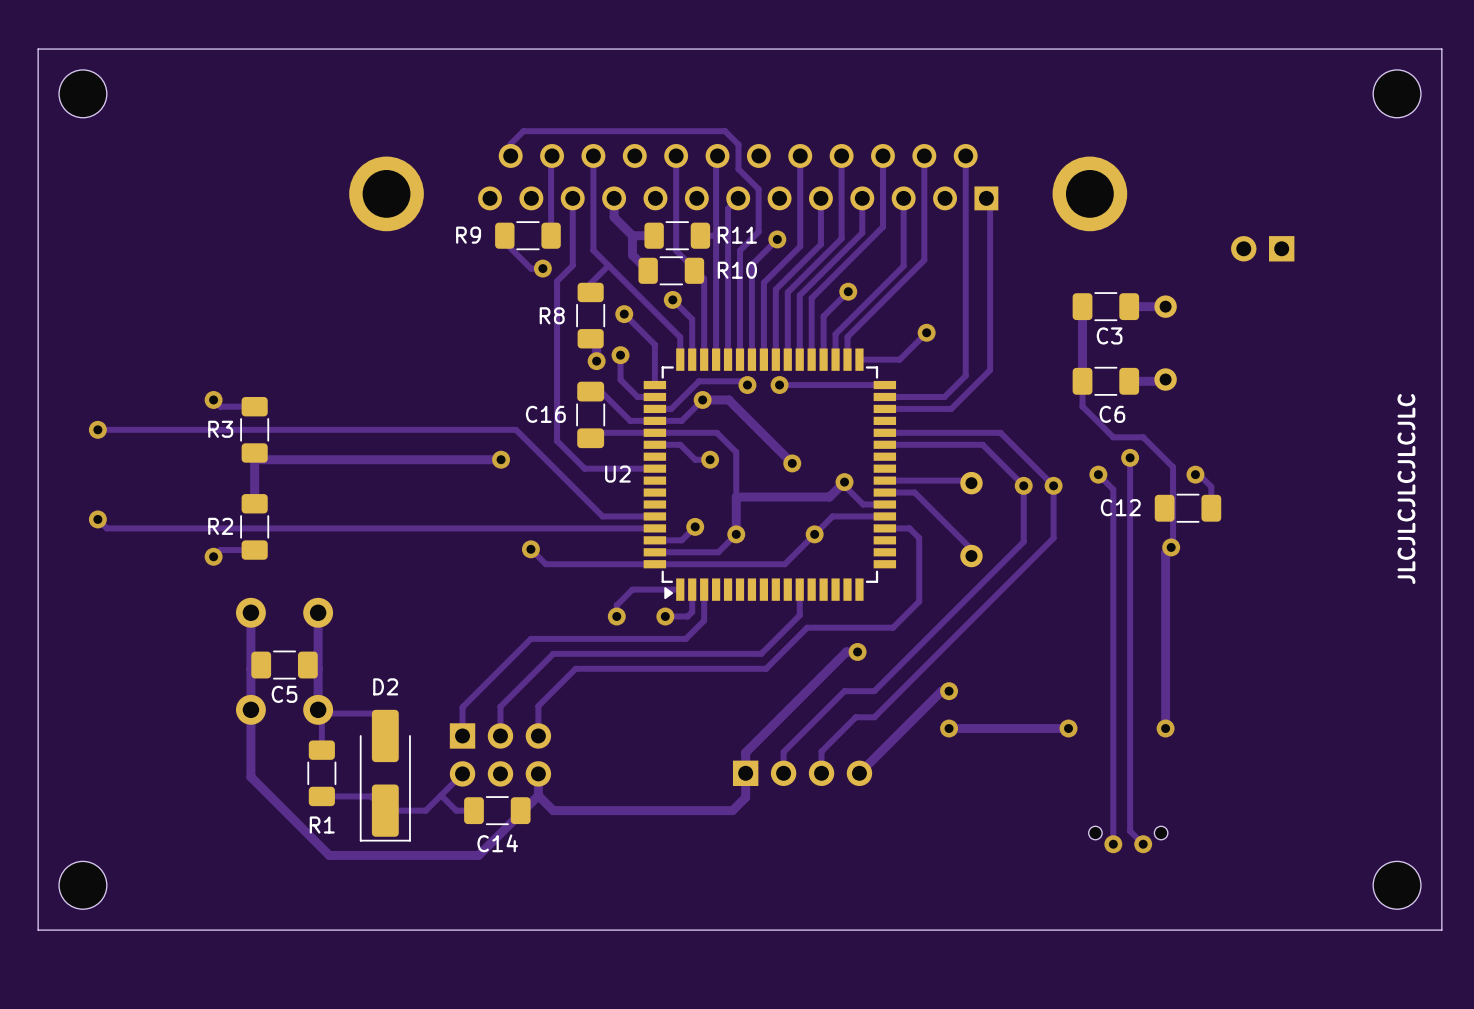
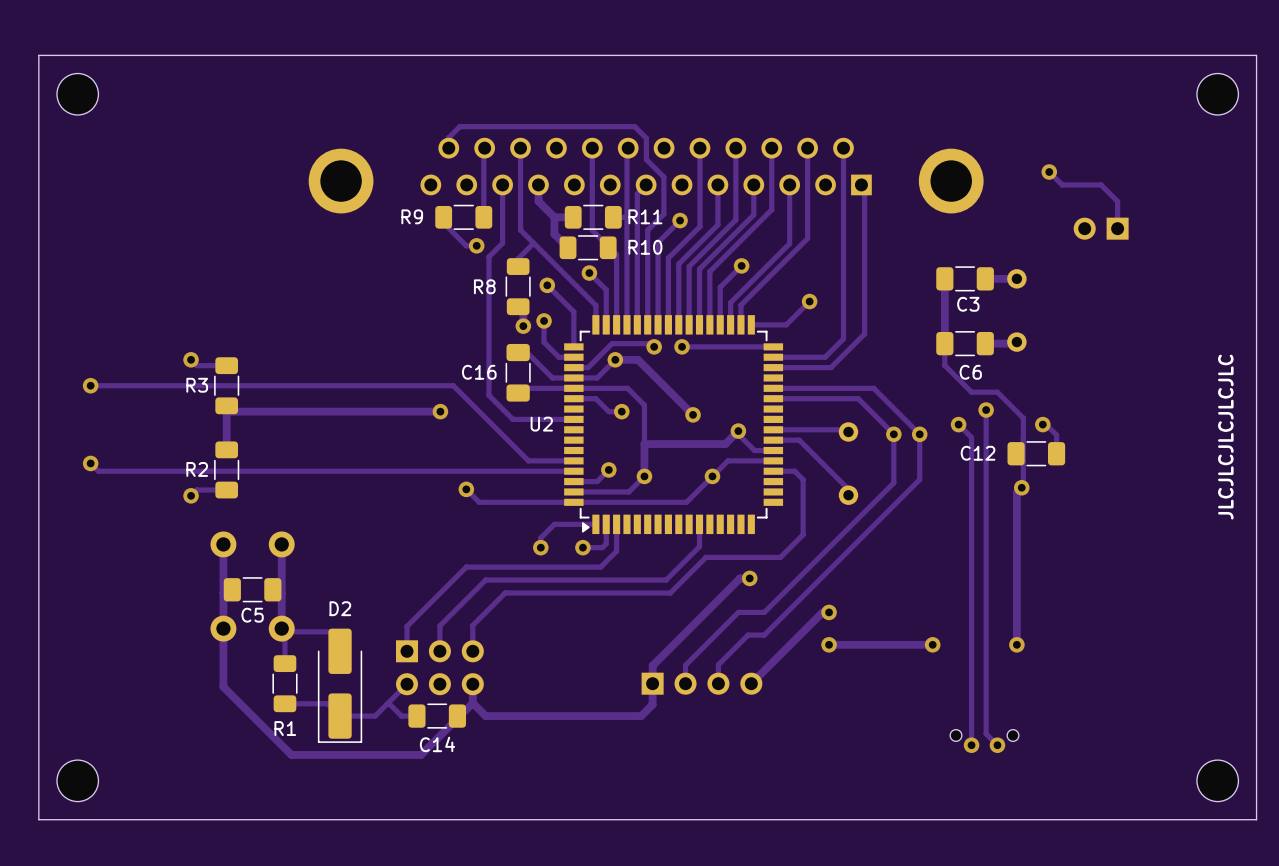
track: none -> (1049, 171) (1062, 184) (1101, 184) (1117, 201) (1117, 228)
via: none -> (1049, 171)

